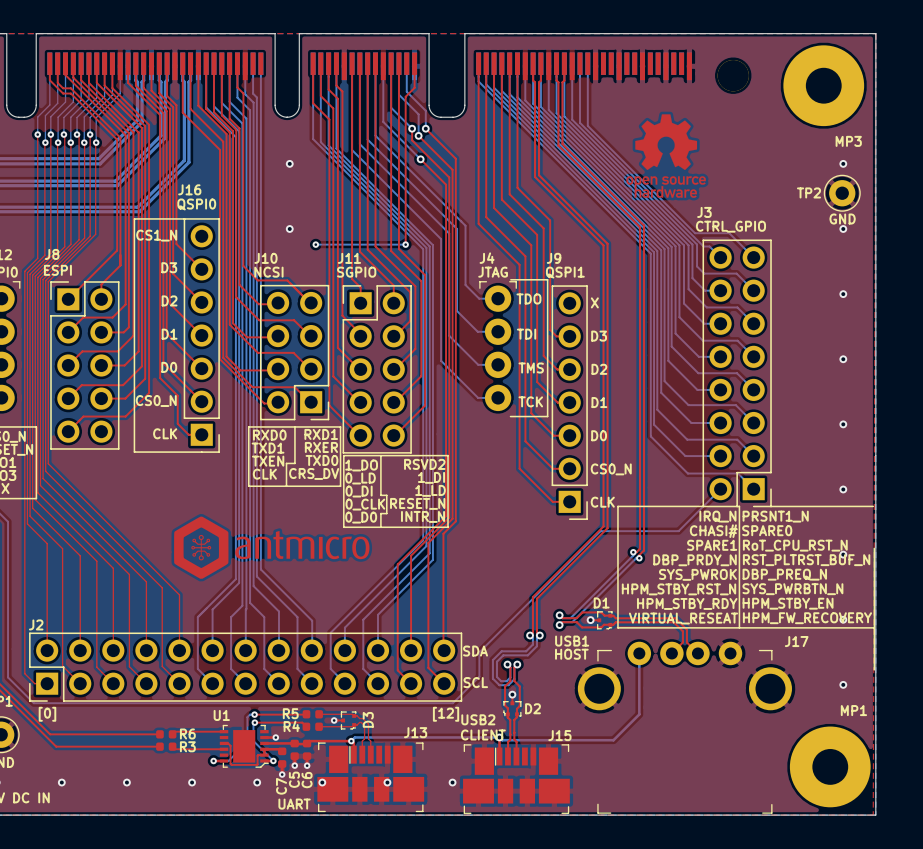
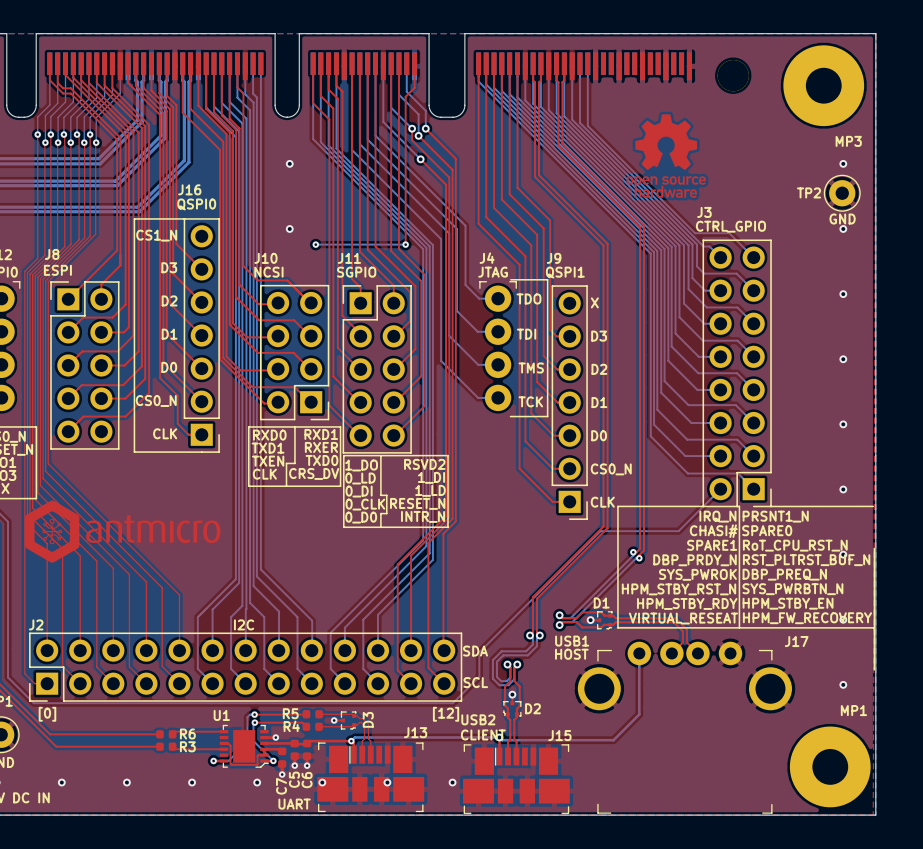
drawing position: (271, 547) -> (122, 531)
text: none -> I2C (244, 624)

